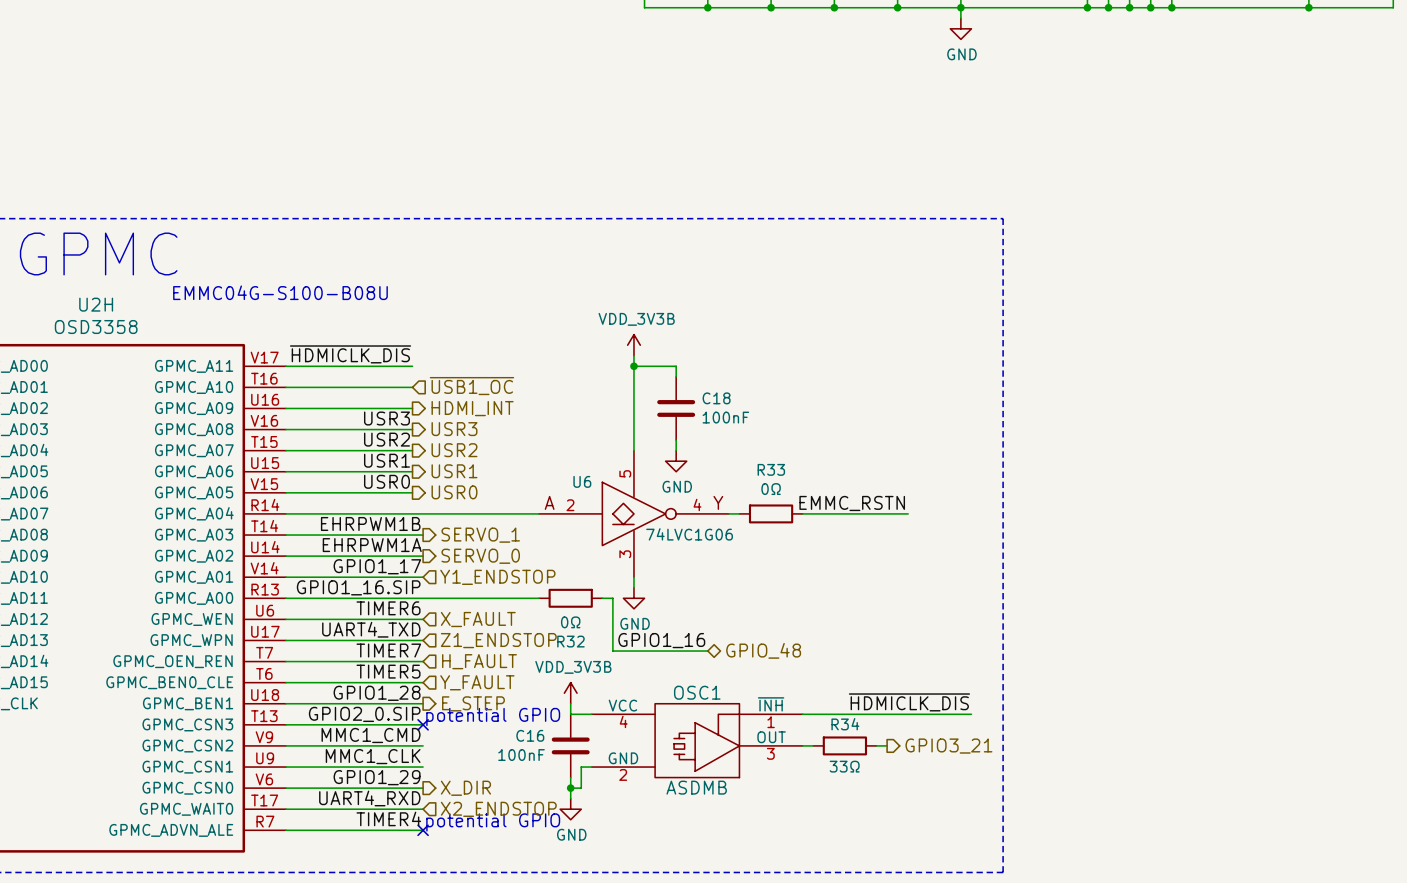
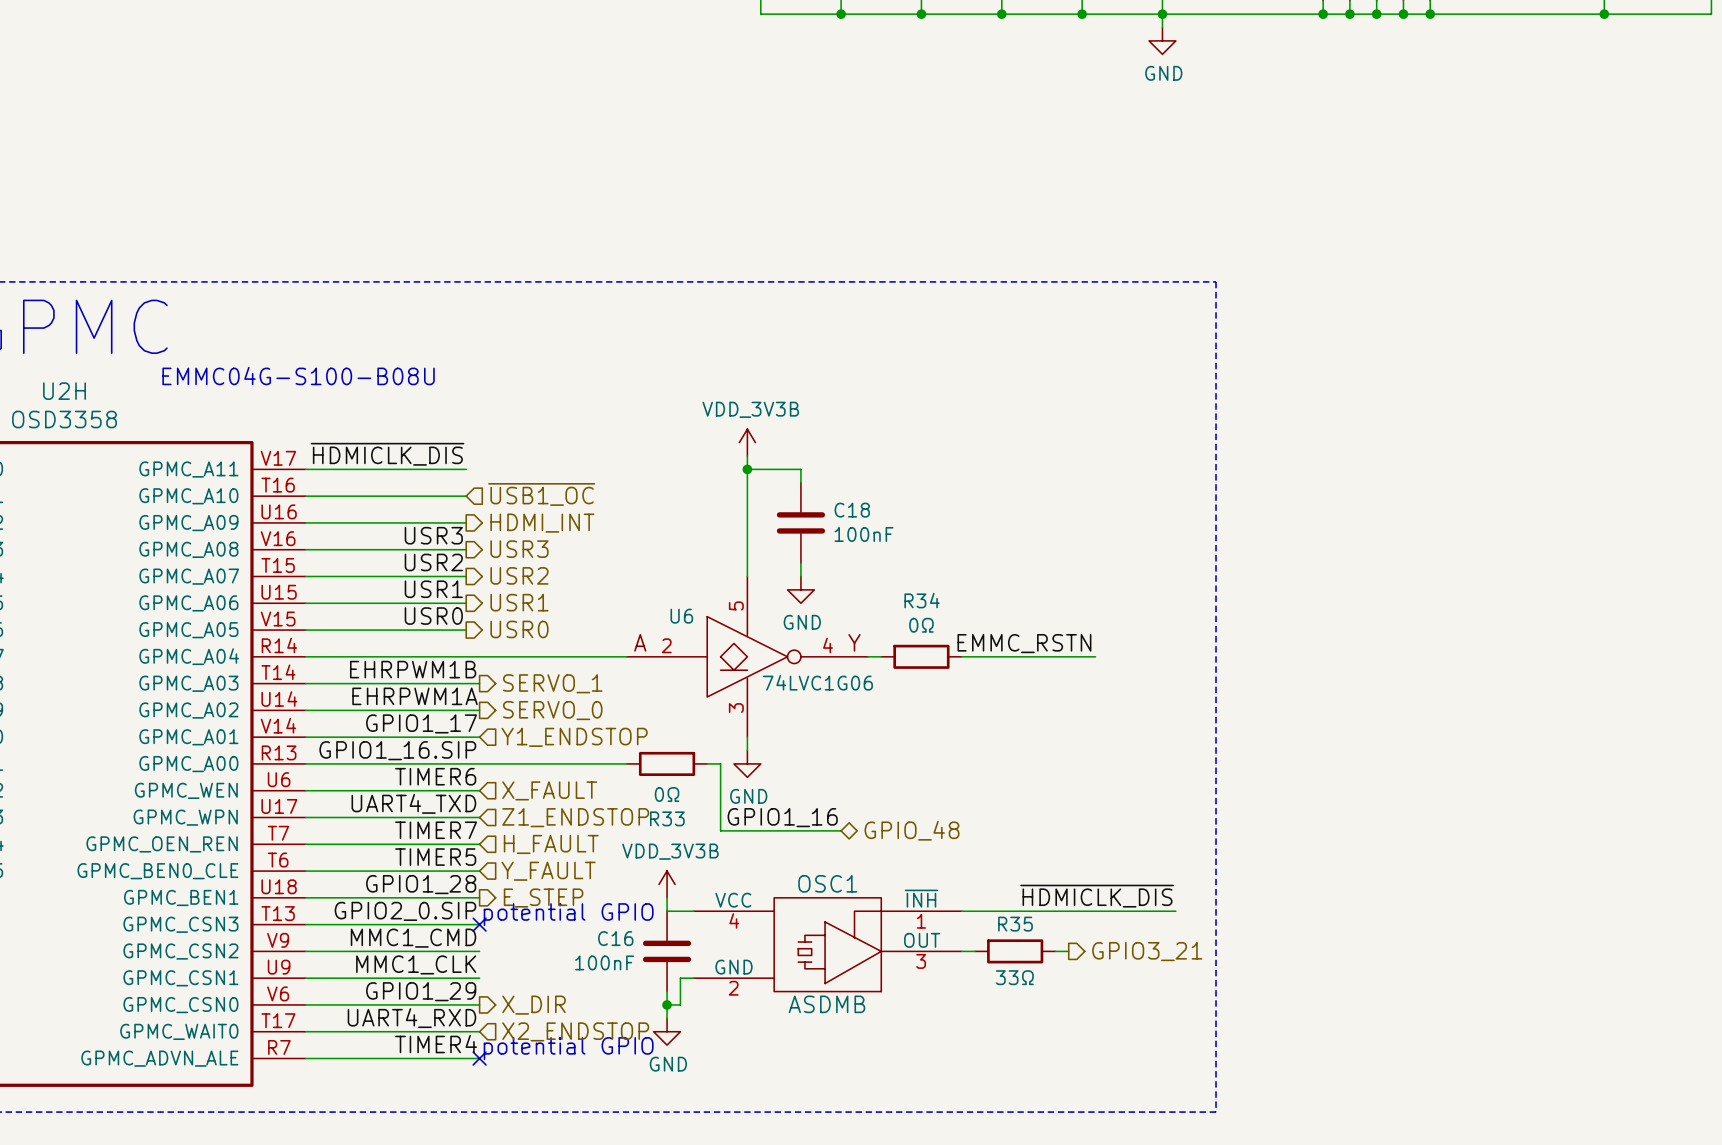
R33 name: R33 (771, 469) -> R34 (922, 600)
R32 name: R32 (570, 641) -> R33 (667, 818)
R34 name: R34 (845, 724) -> R35 (1015, 924)

